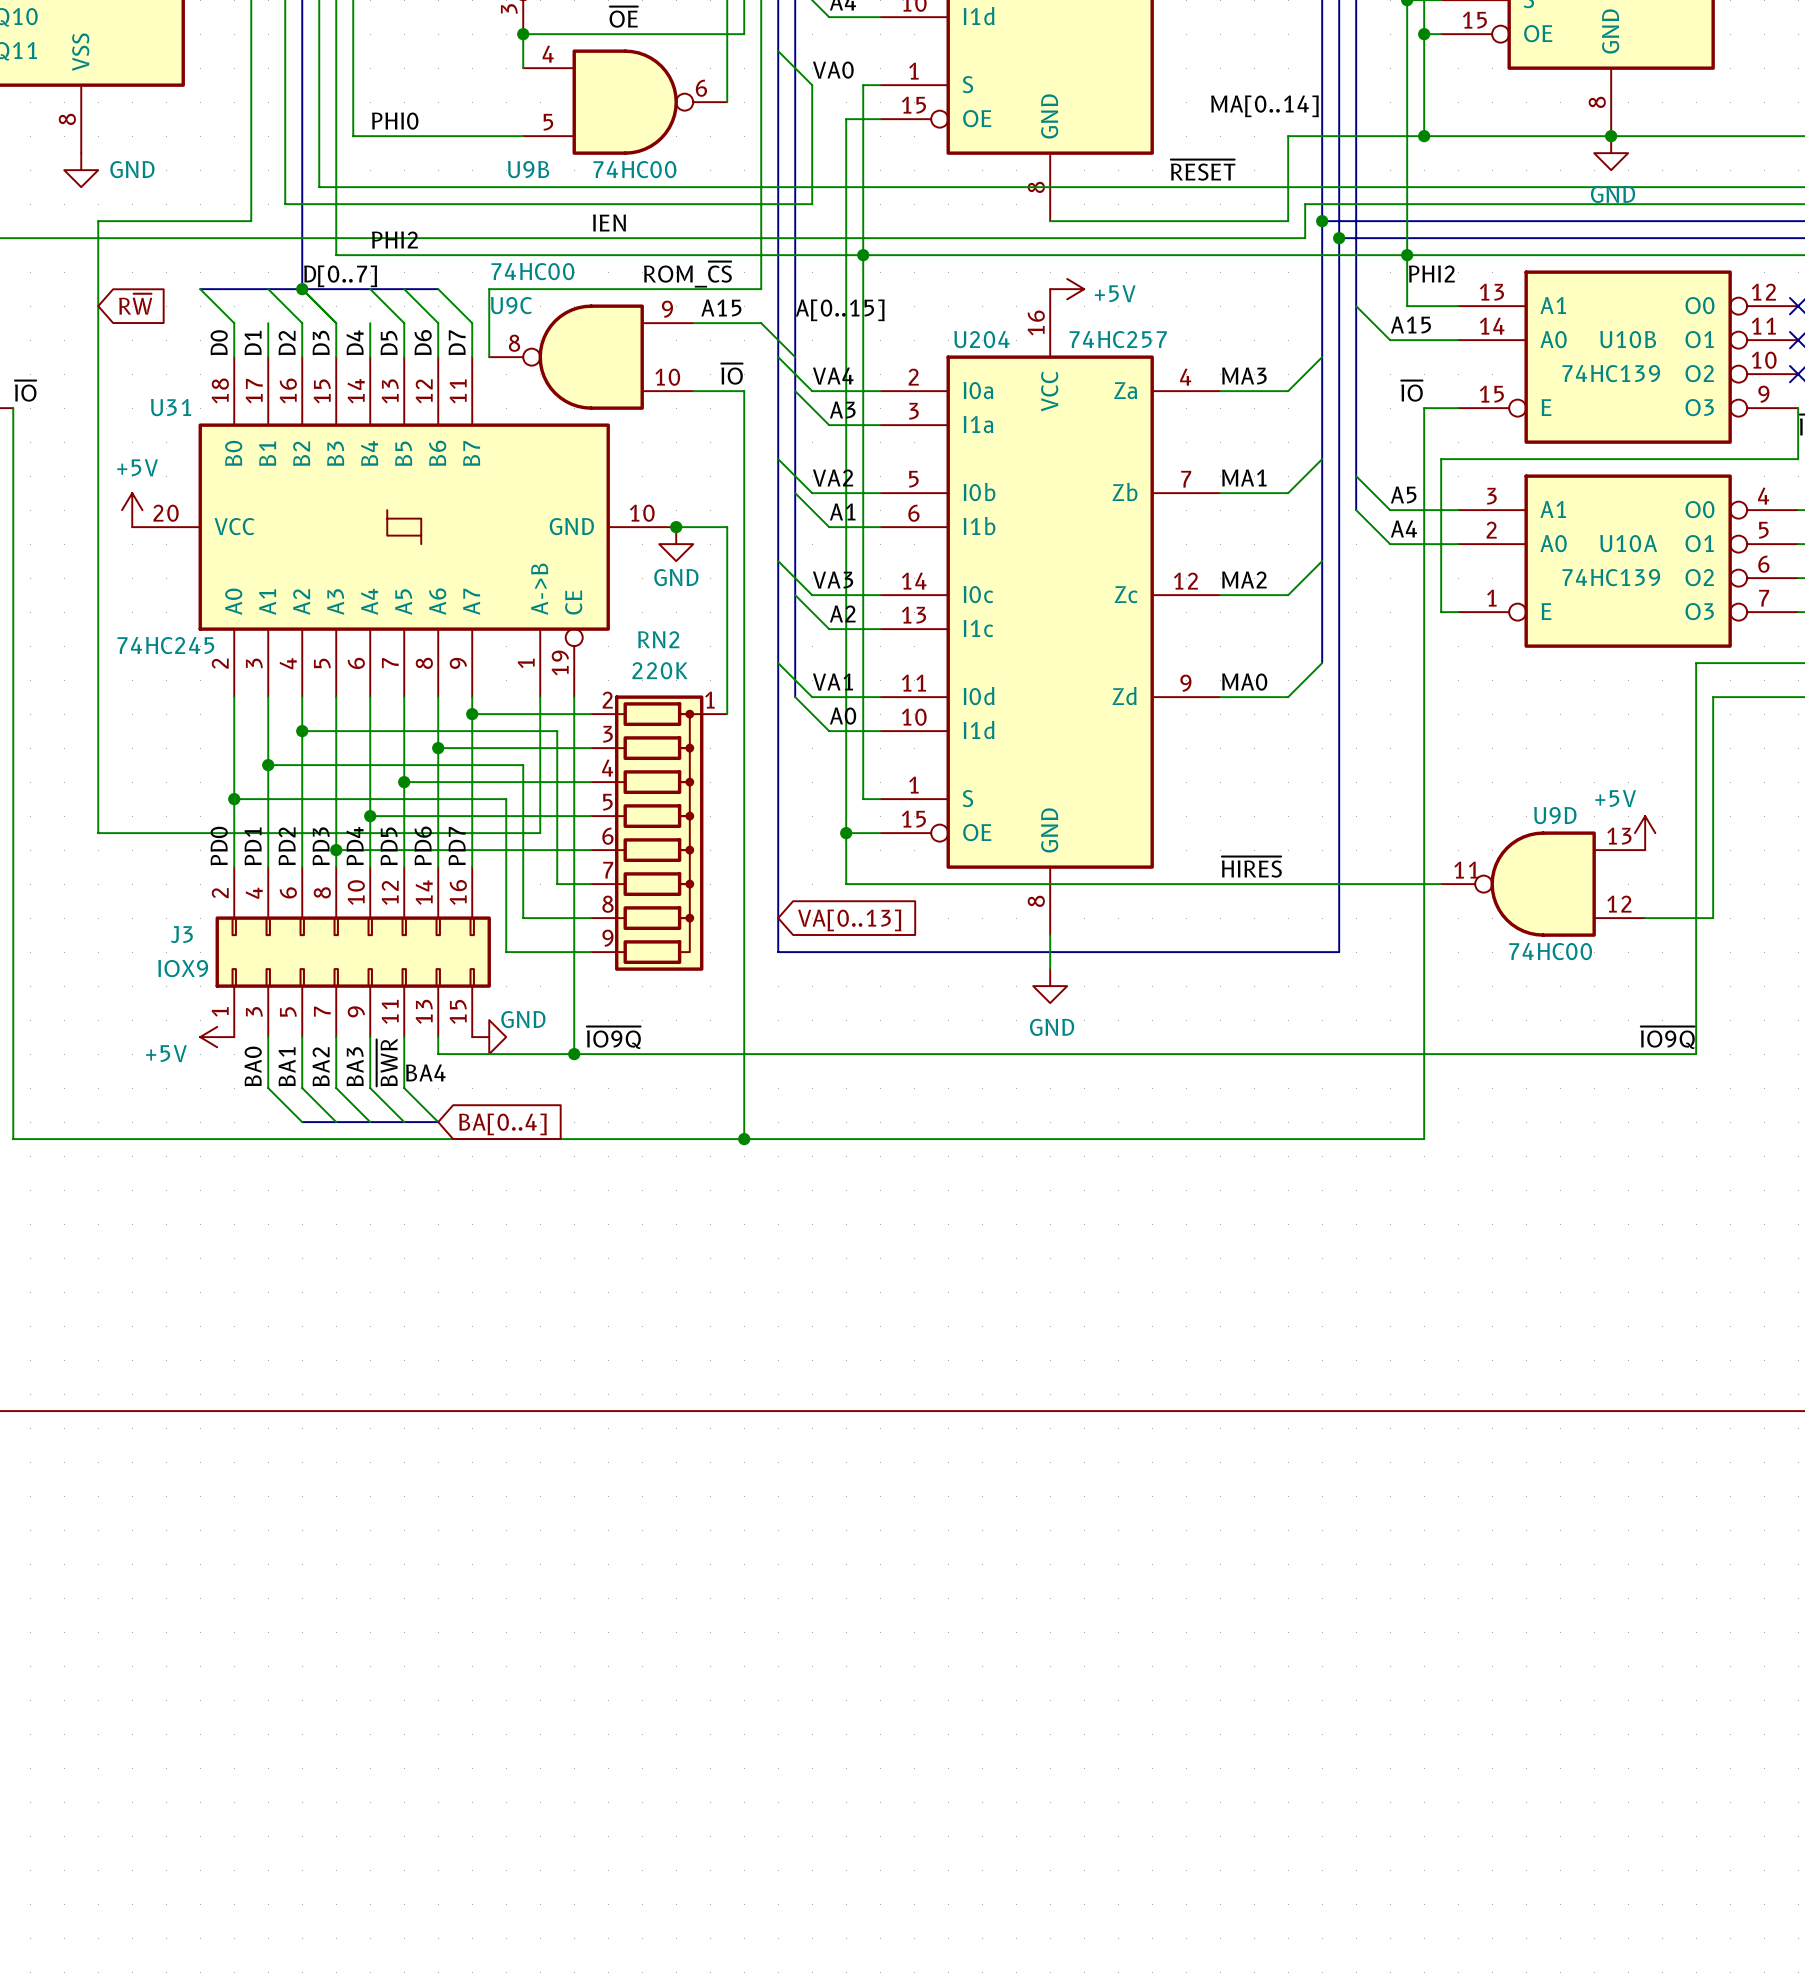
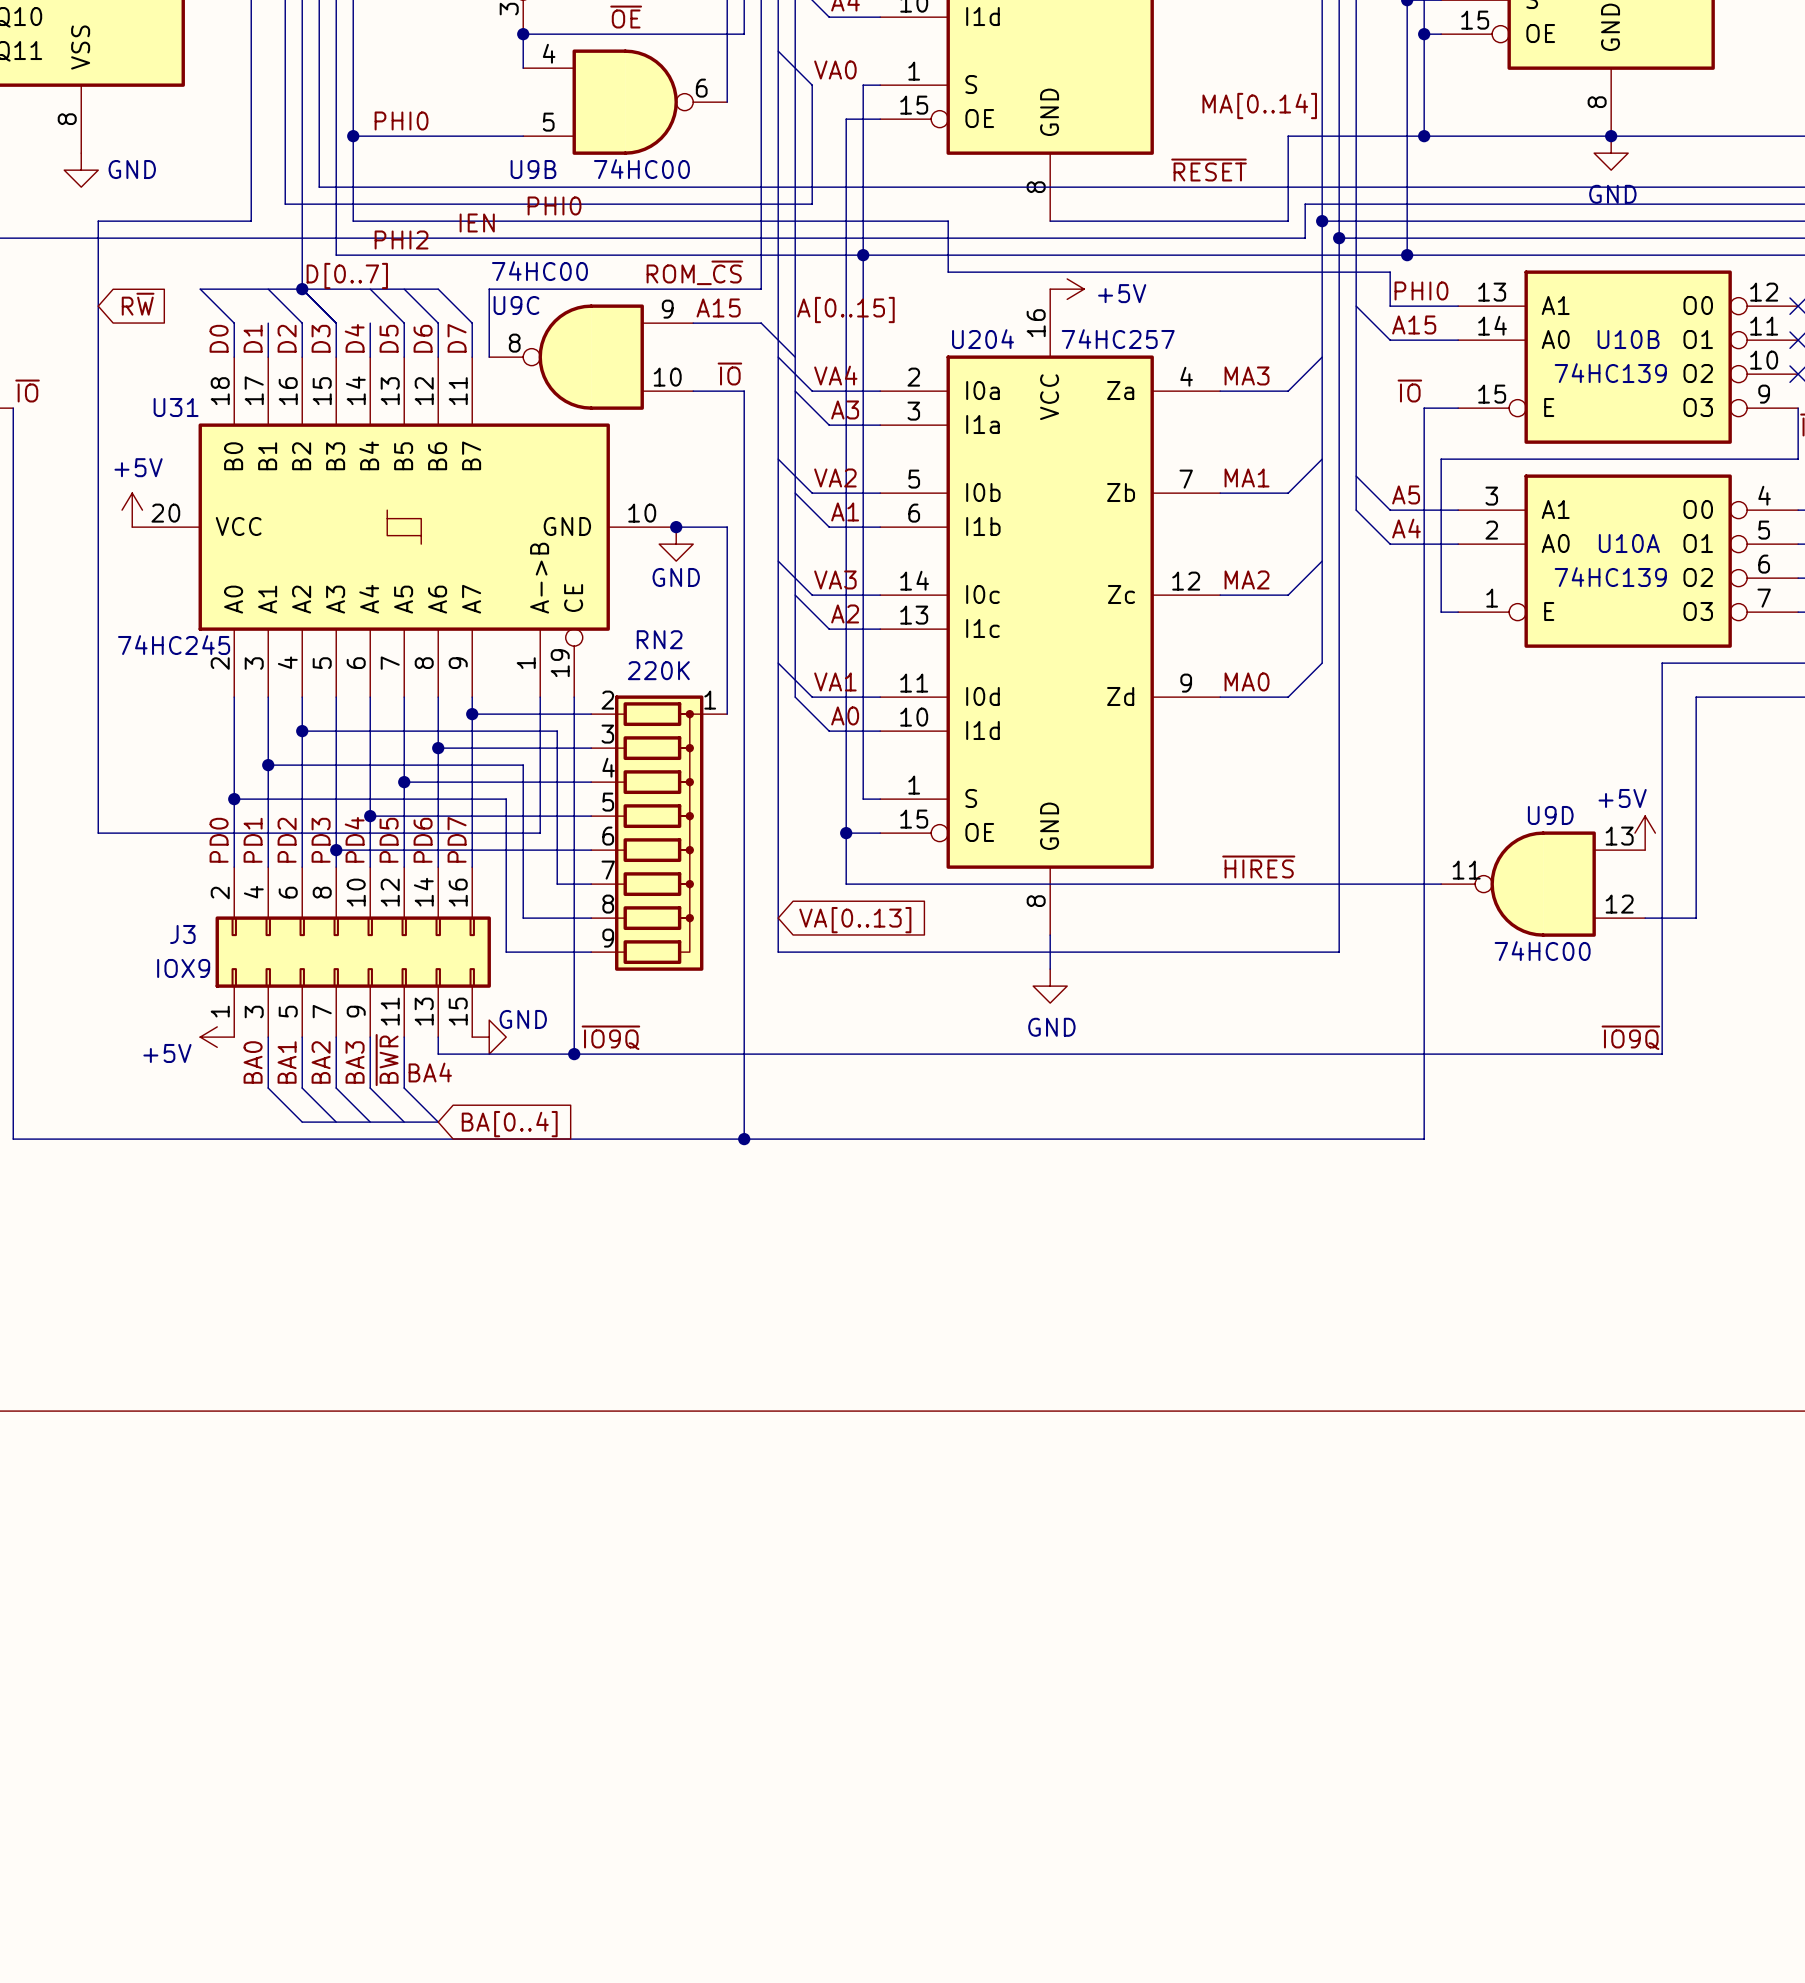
junction: none -> (353, 136)
label: none -> PHI0 (554, 205)
label position: IEN (609, 222) -> IEN (477, 222)
wire: (1407, 255) (1407, 306) -> (353, 136) (353, 221) (948, 221) (948, 272) (1390, 272) (1390, 306) (1407, 306)
label: PHI2 (1431, 273) -> PHI0 (1421, 290)
wire: (1696, 663) (1696, 697) -> (1713, 697) (1696, 697)
wire: (1713, 697) (1713, 918) (1696, 918) (1696, 1054) (1662, 1054) -> (1696, 663) (1662, 663) (1662, 1054)
label position: ~{IO9Q} (1667, 1037) -> ~{IO9Q} (1630, 1037)

